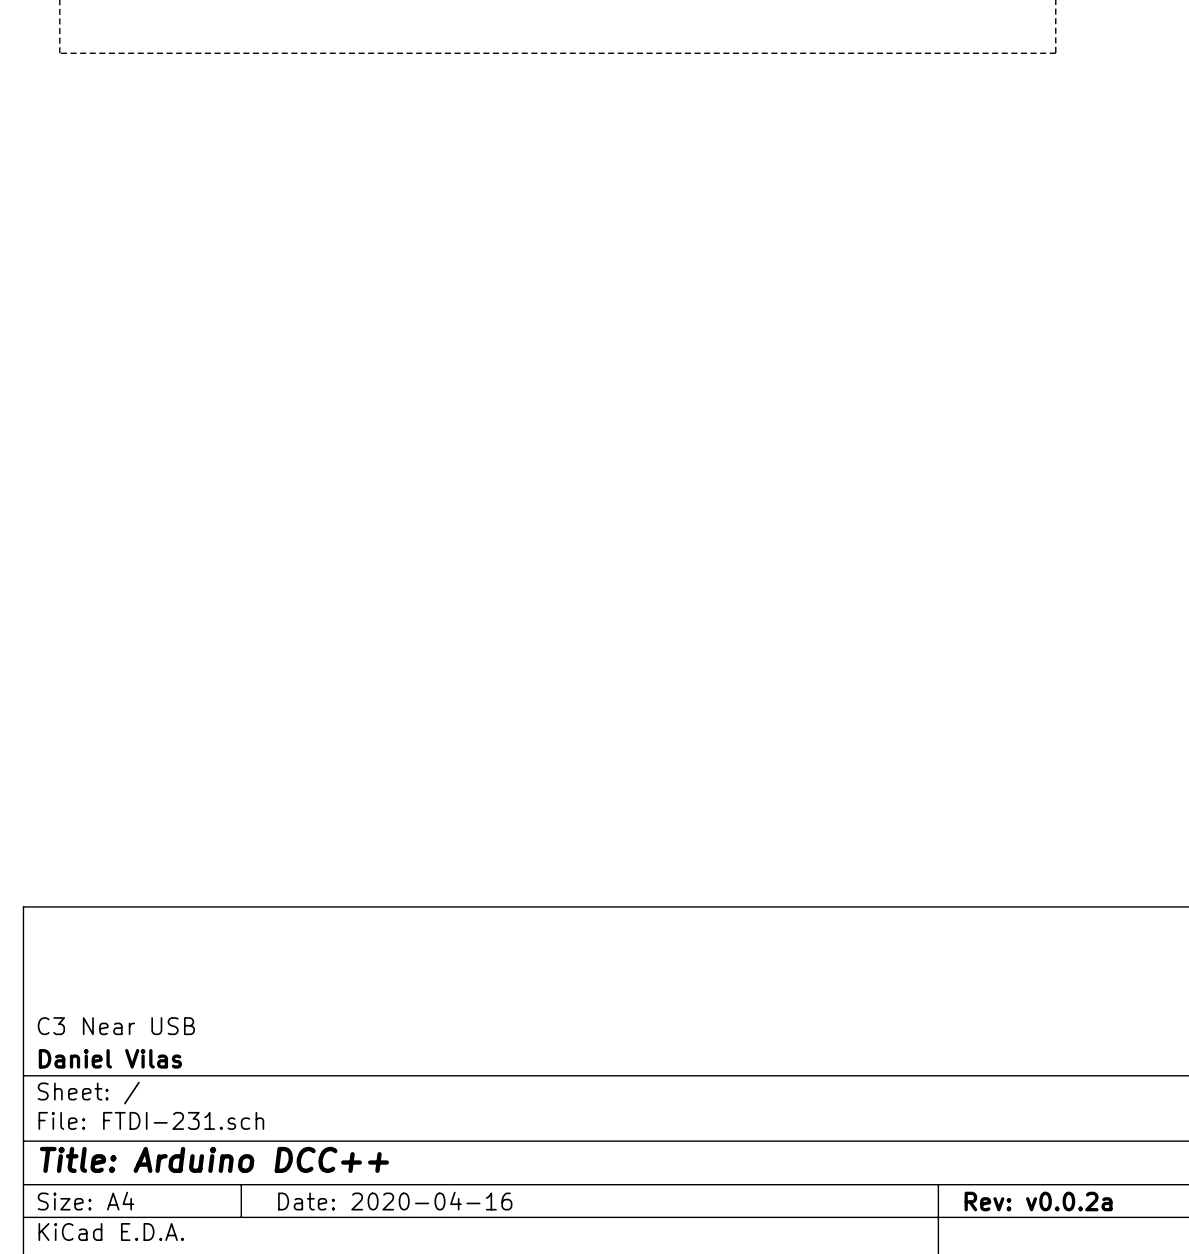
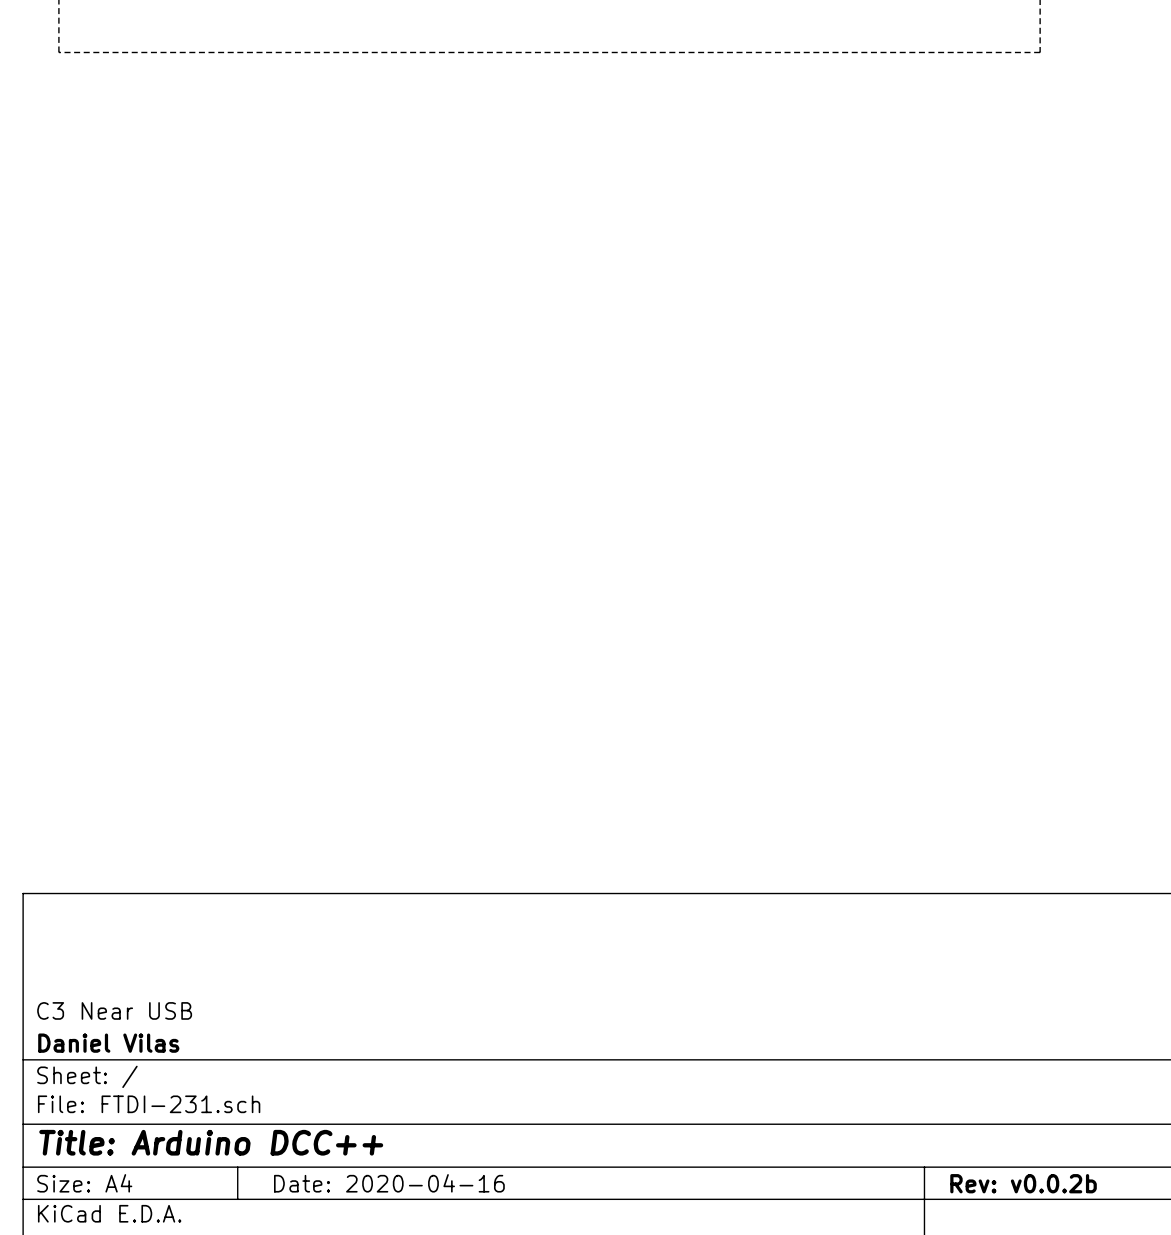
title block: Rev: v0.0.2a (1038, 1201) -> Rev: v0.0.2b (1023, 1183)

